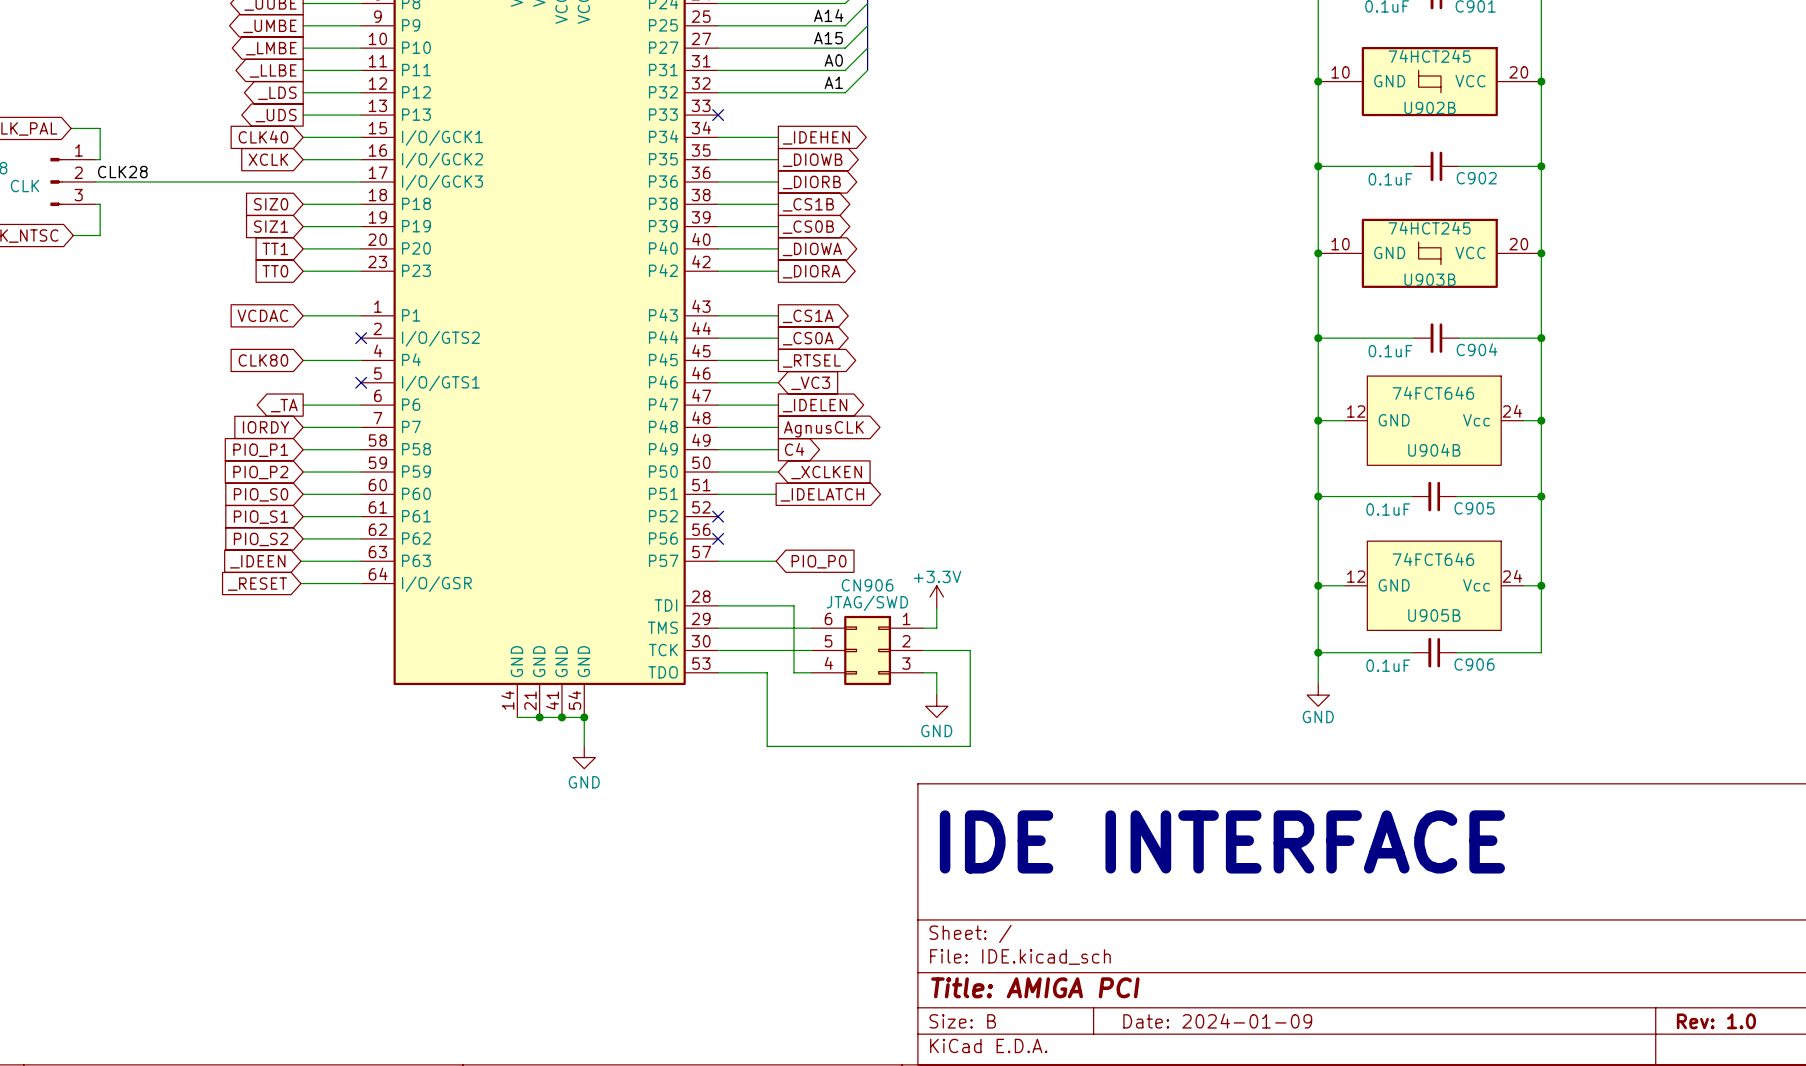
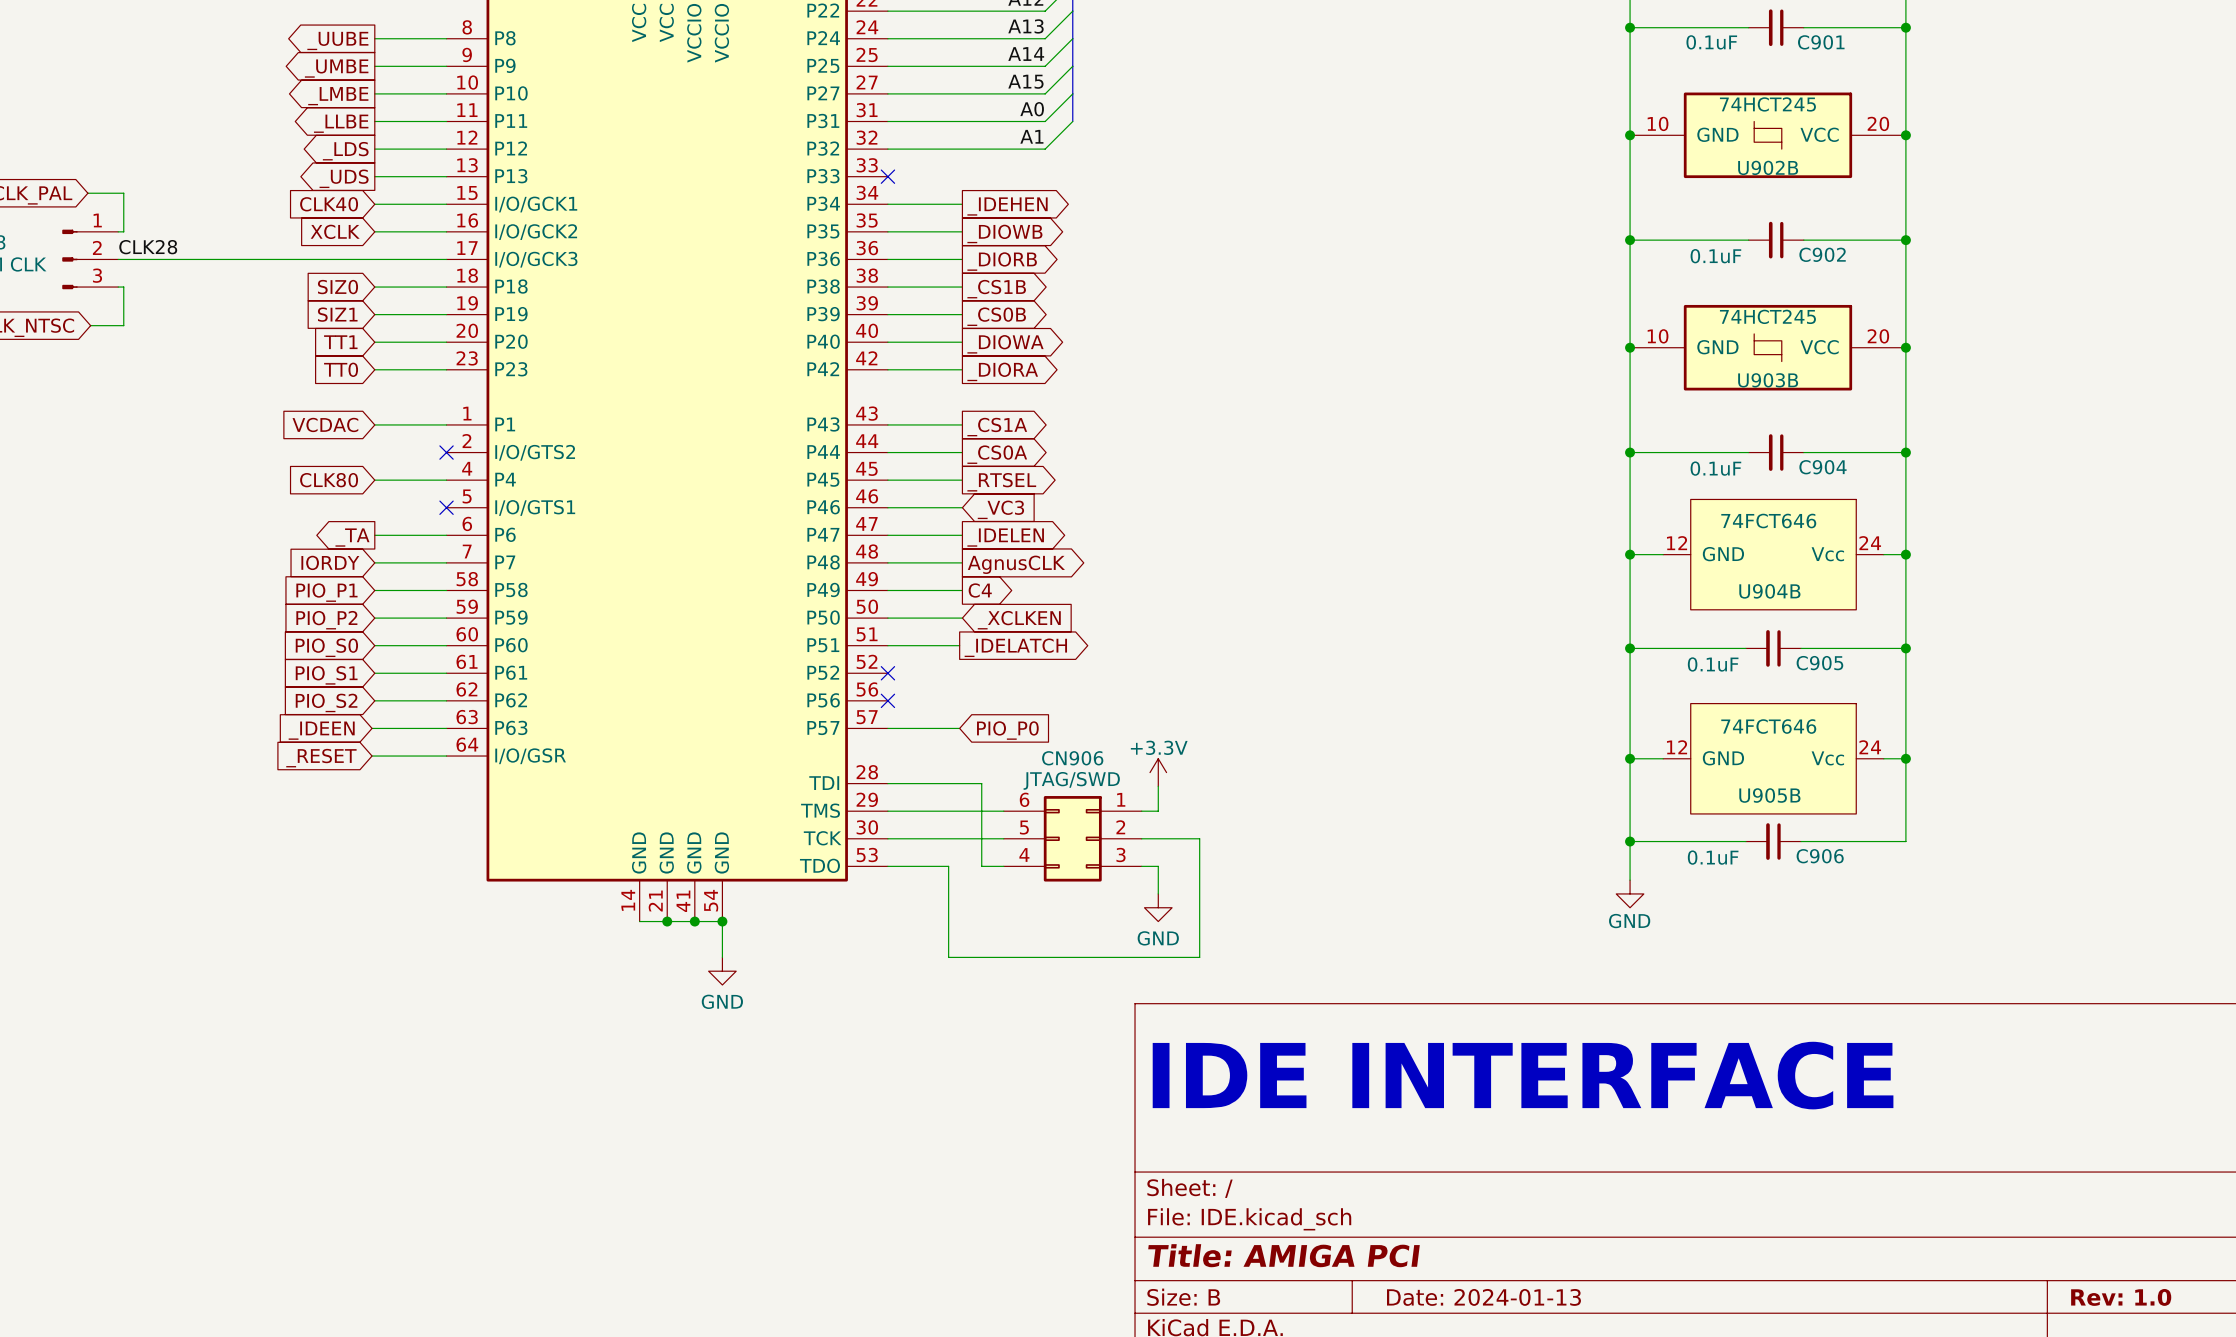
title block: Date: 2024-01-09 (1217, 1021) -> Date: 2024-01-13 (1483, 1297)

